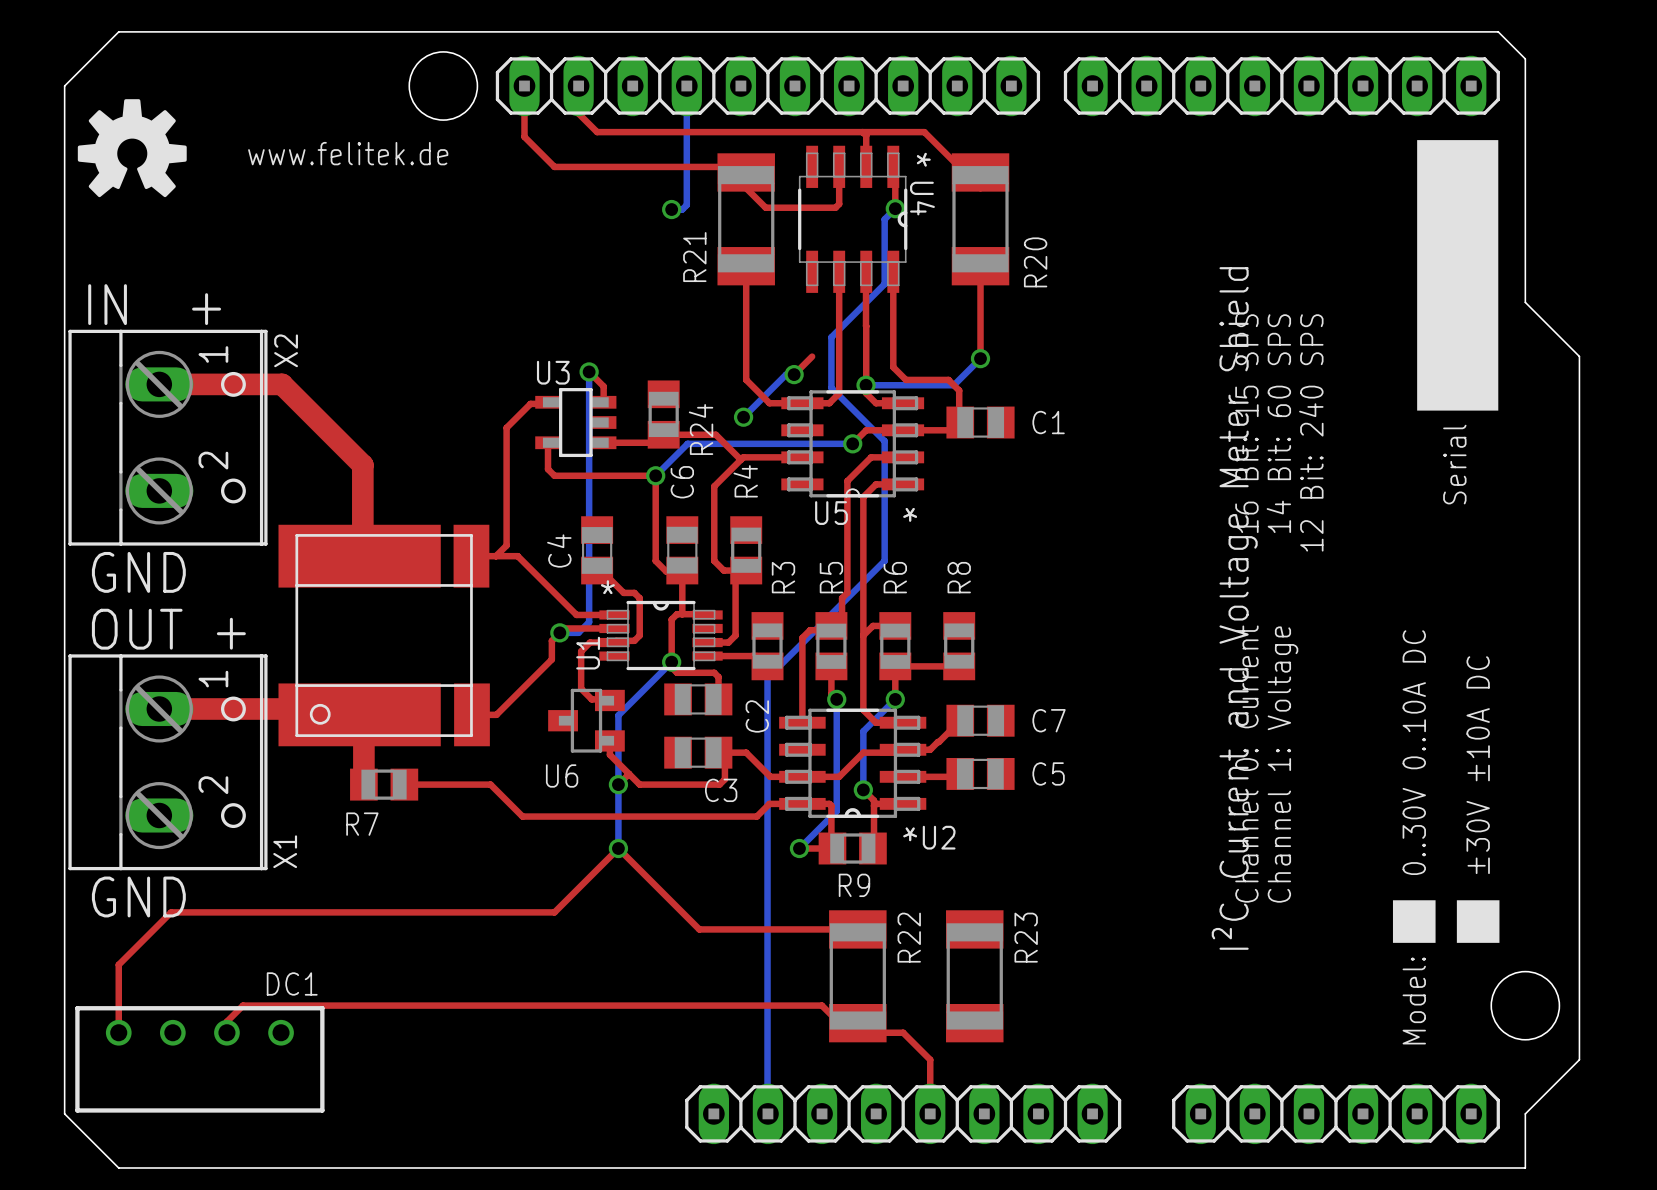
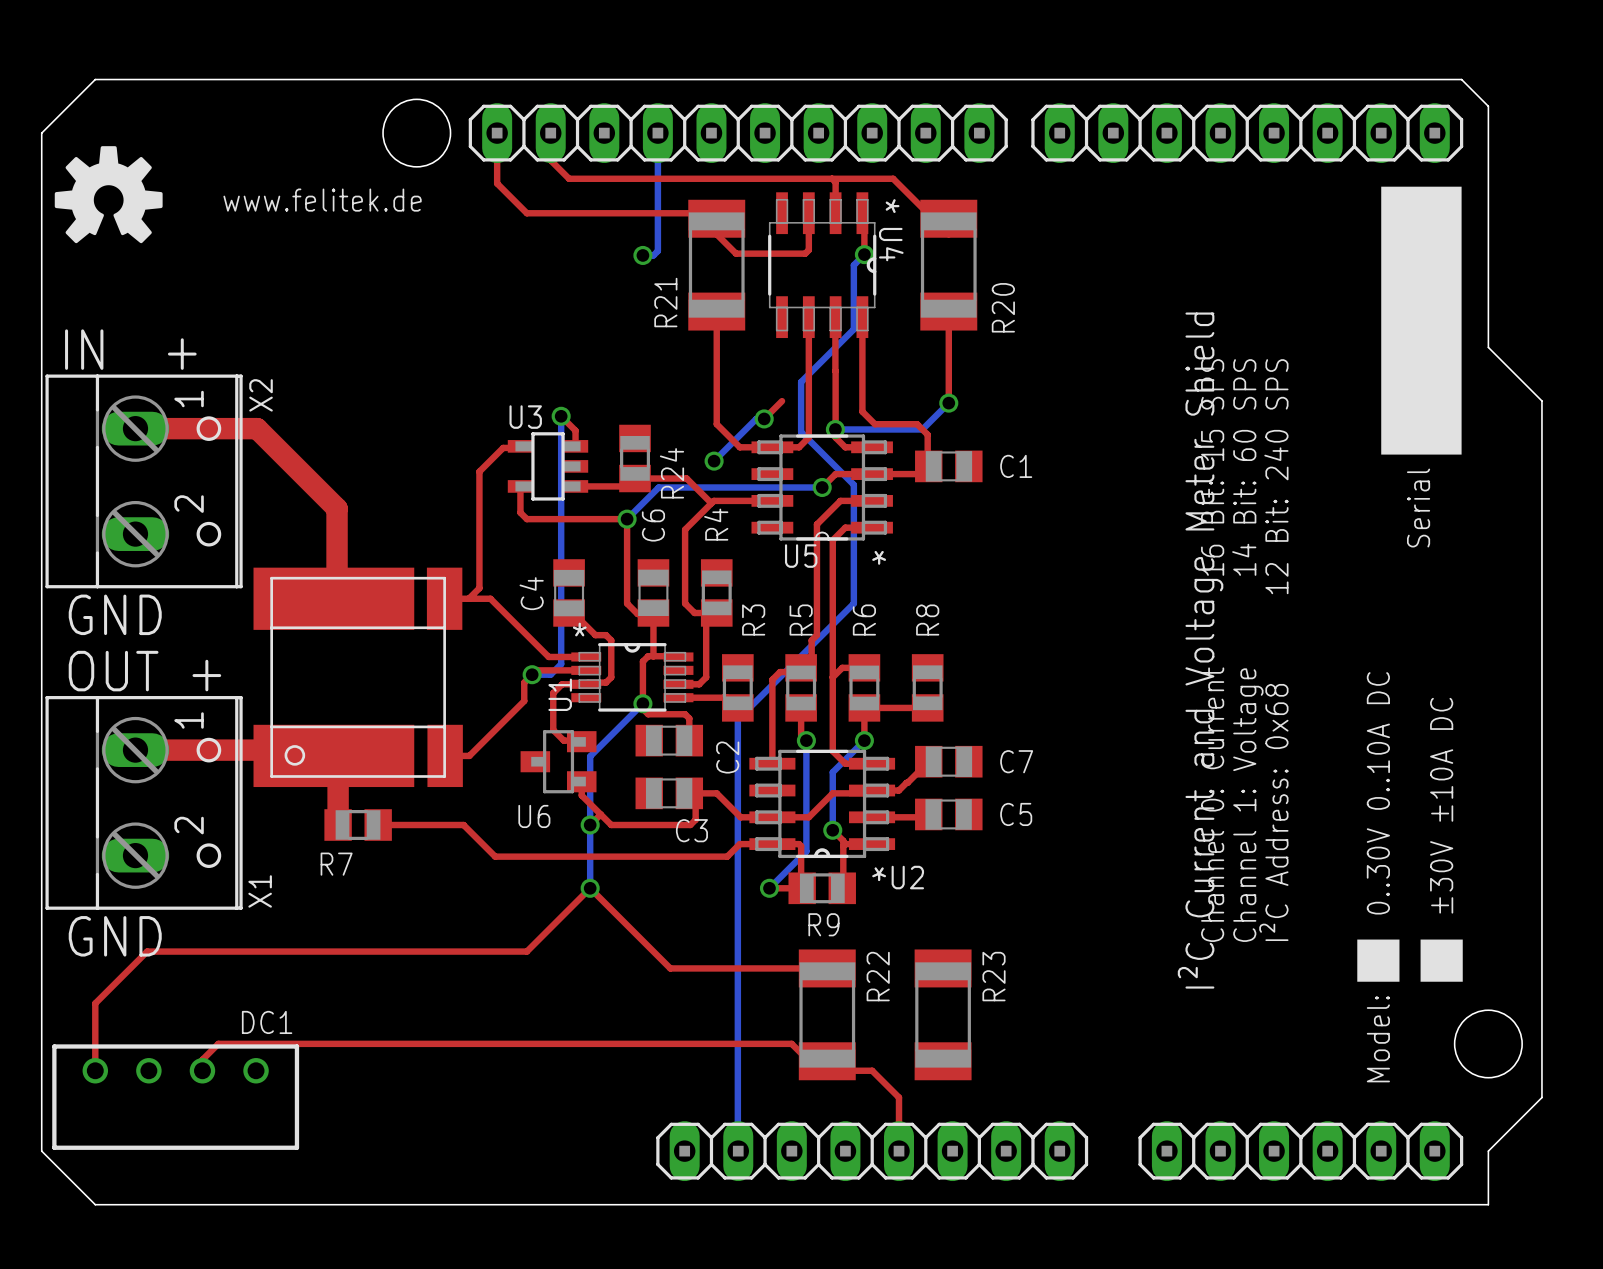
text: none -> I²C Address: 0x68 (1273, 812)

